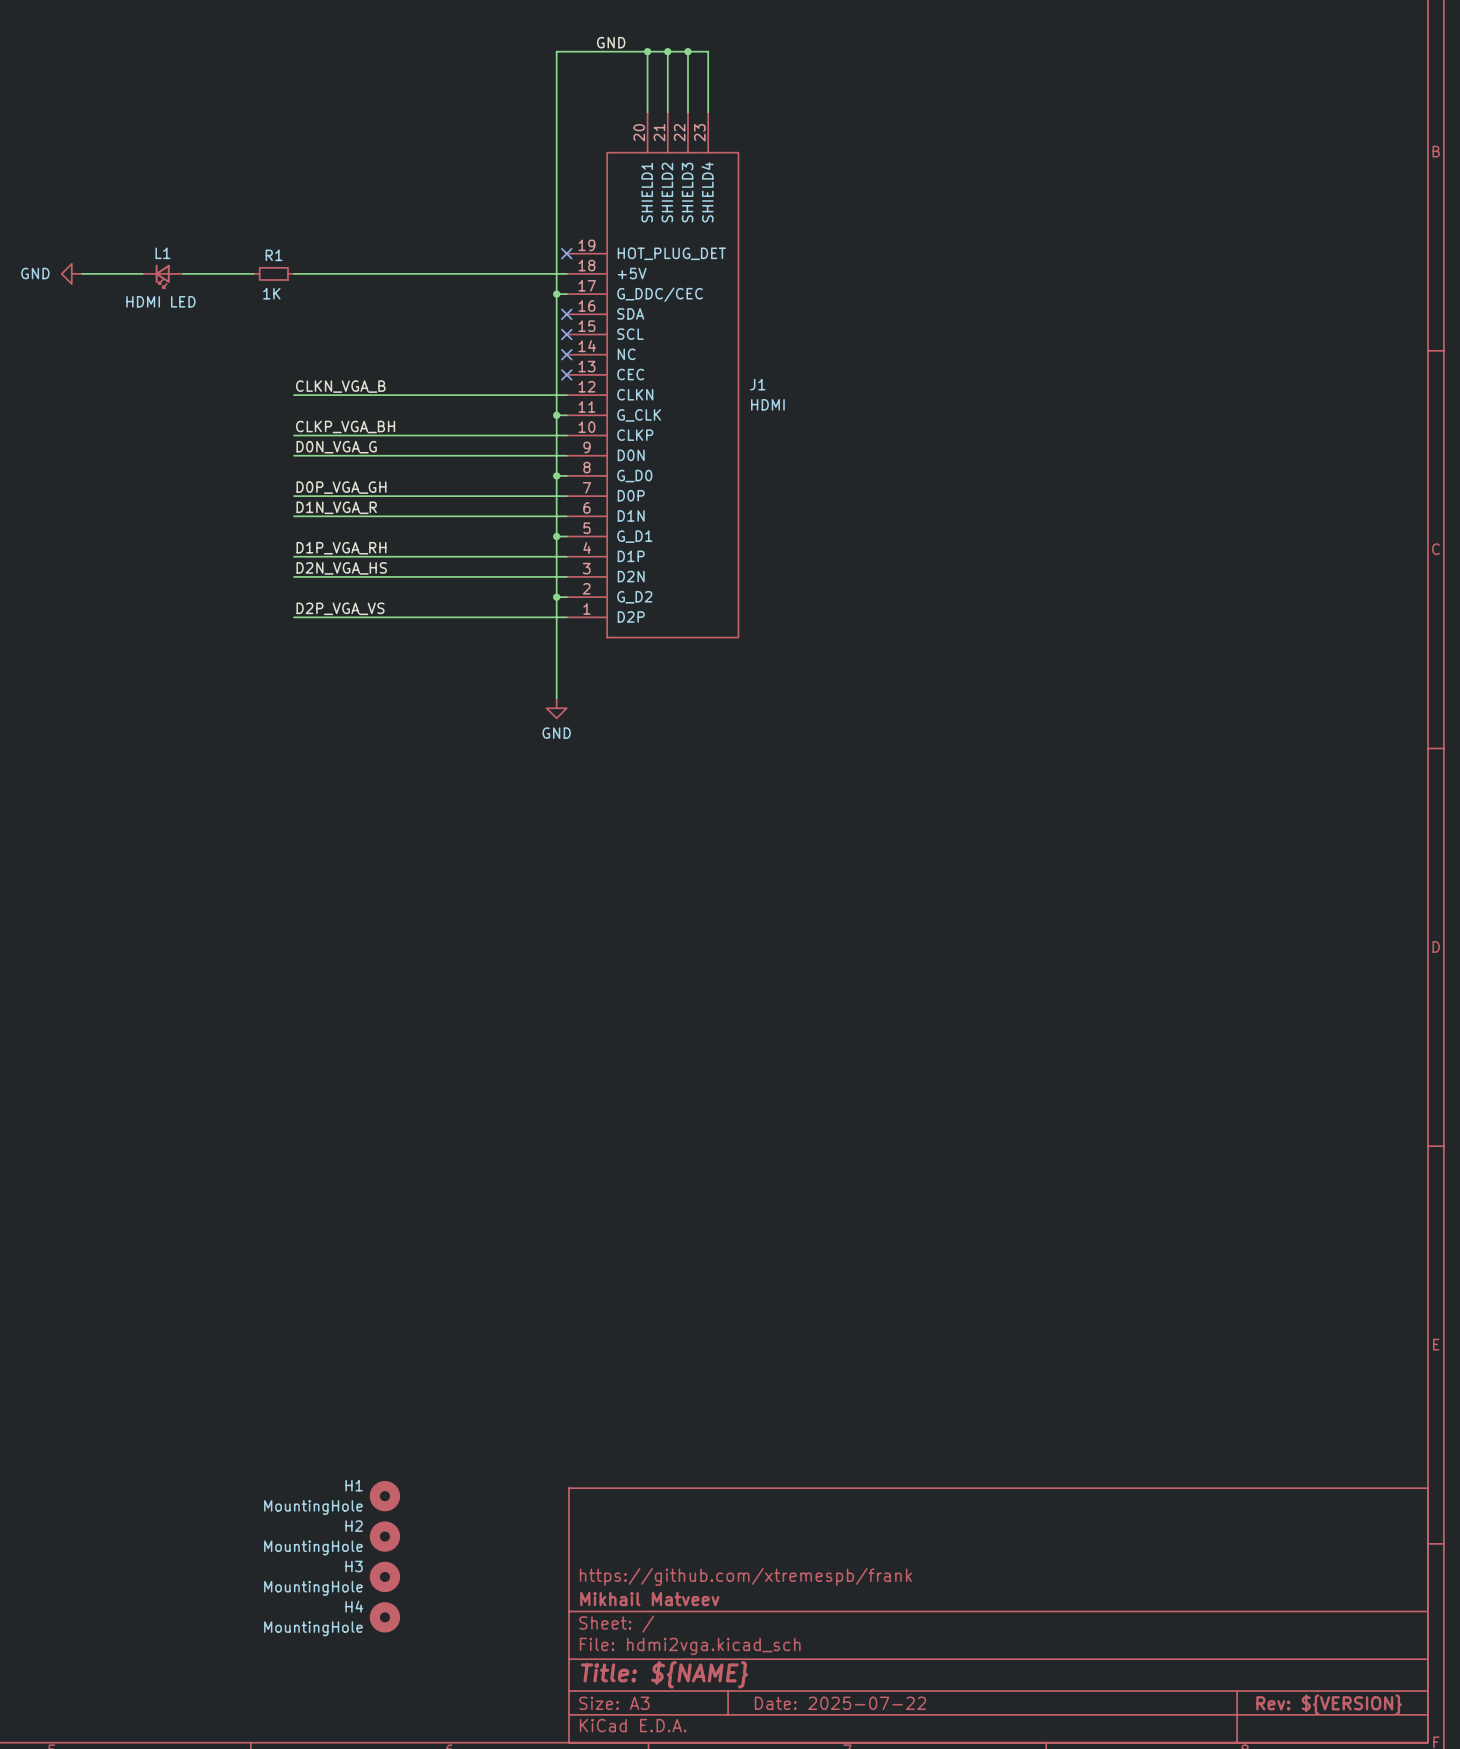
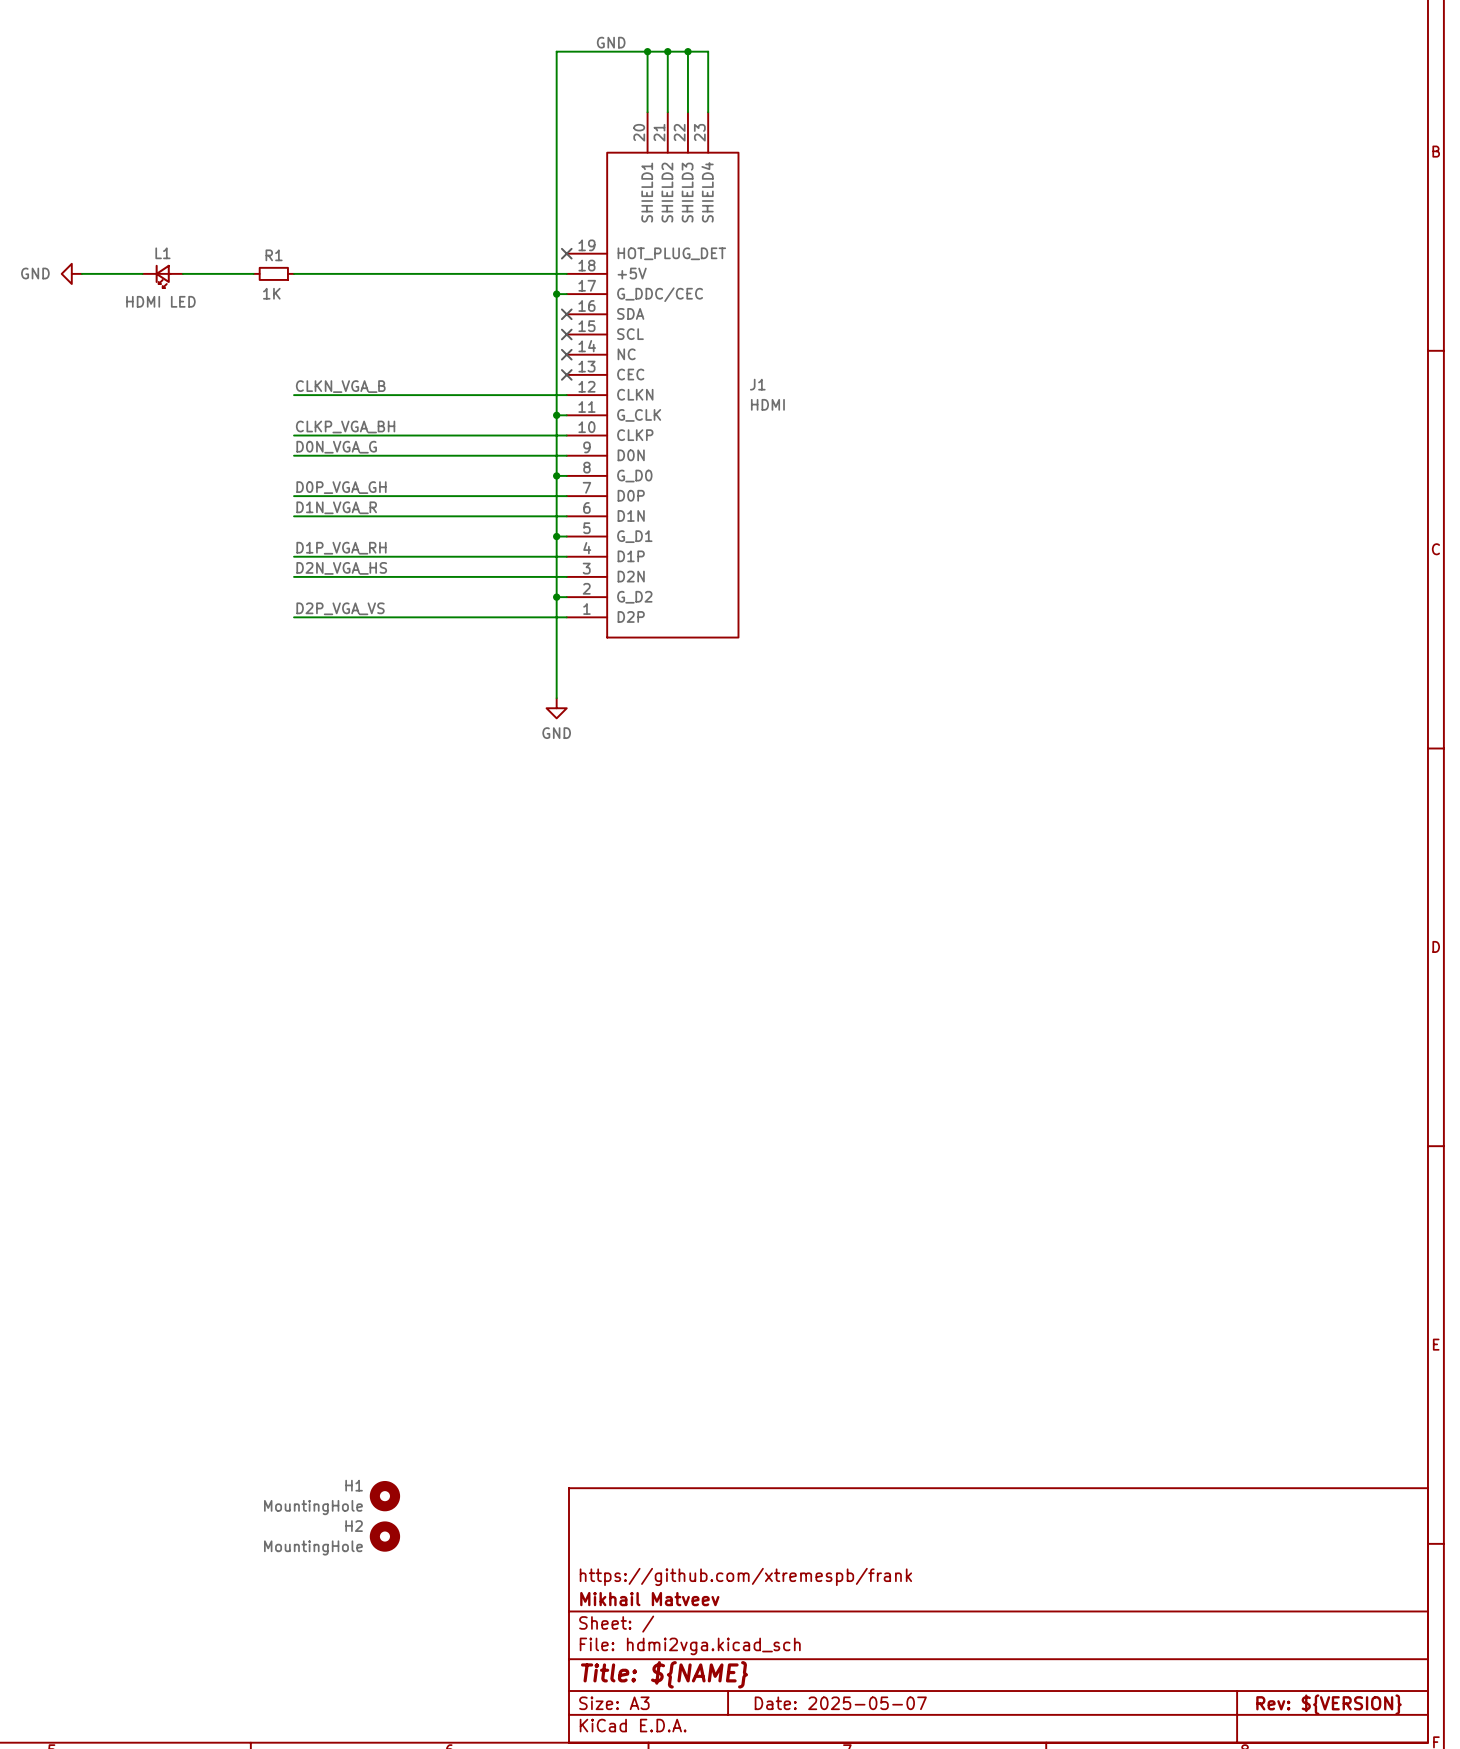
H3: MountingHole (384, 1576) -> none
H4: MountingHole (384, 1617) -> none
title block: Date: 2025-07-22 (840, 1703) -> Date: 2025-05-07 (840, 1703)

